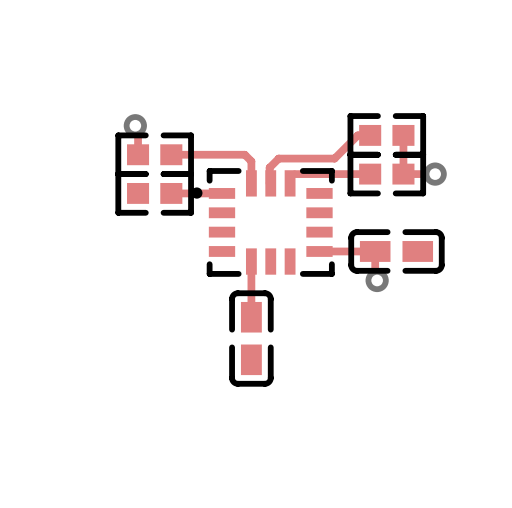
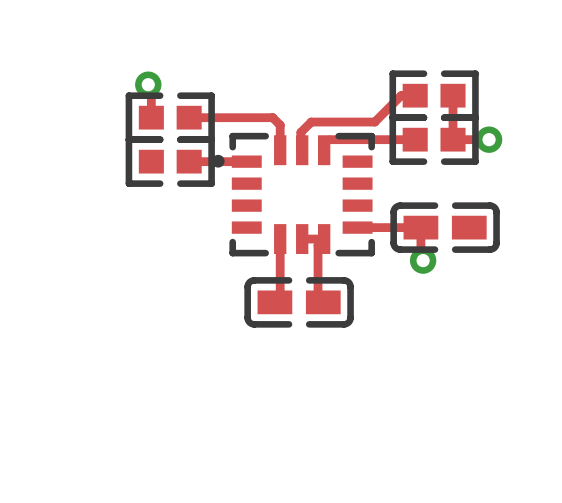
top track: none -> (302, 239) (324, 239) (318, 245) (318, 302)
part rotation: 0° (251, 338) -> 90° clockwise (299, 302)

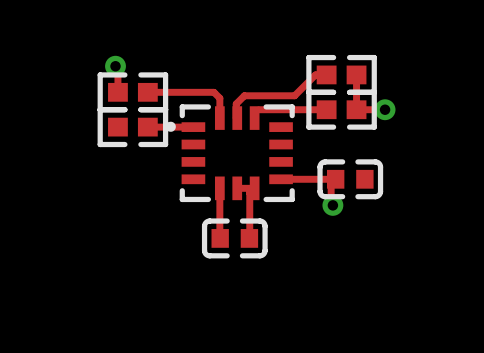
part footprint: [390, 202, 500, 253] -> [317, 159, 384, 200]
part footprint: [244, 277, 354, 328] -> [201, 218, 268, 259]

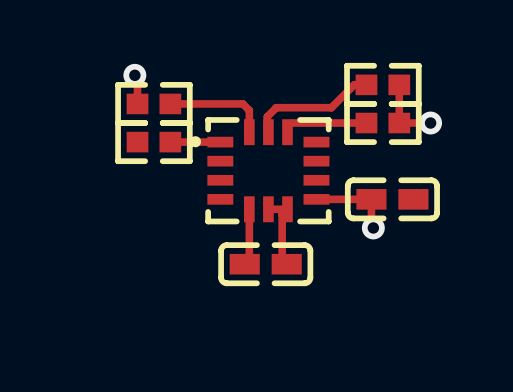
part footprint: [317, 159, 384, 200] -> [344, 177, 440, 222]
part footprint: [201, 218, 268, 259] -> [218, 242, 314, 287]

